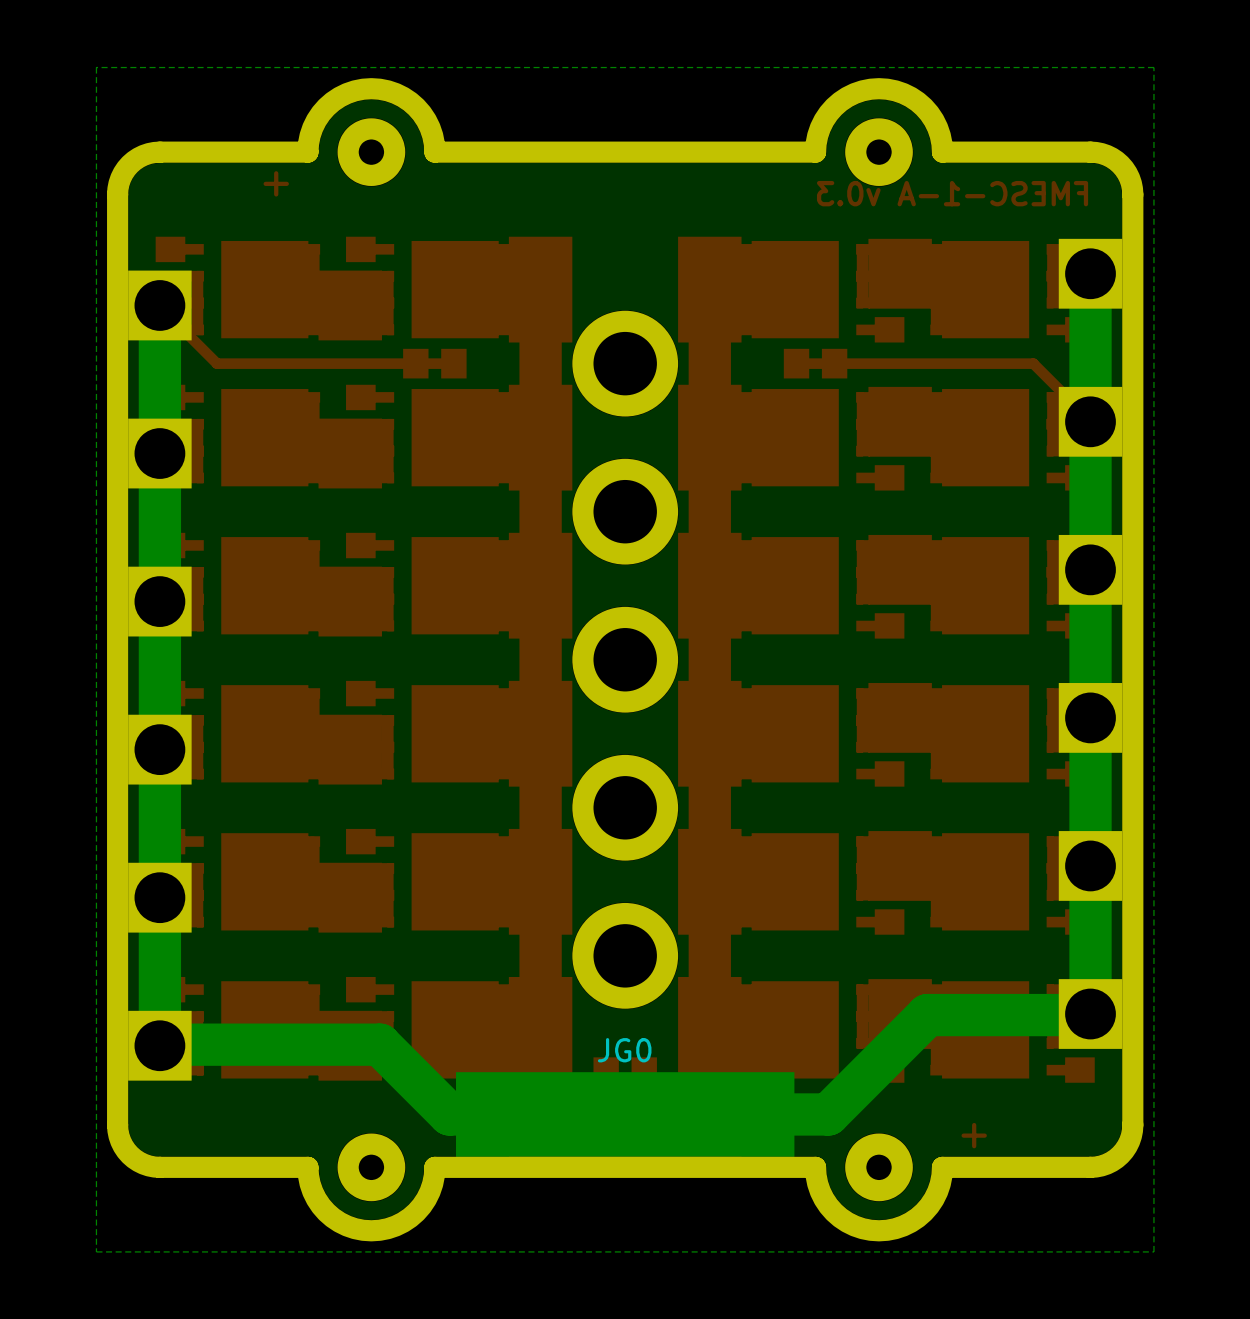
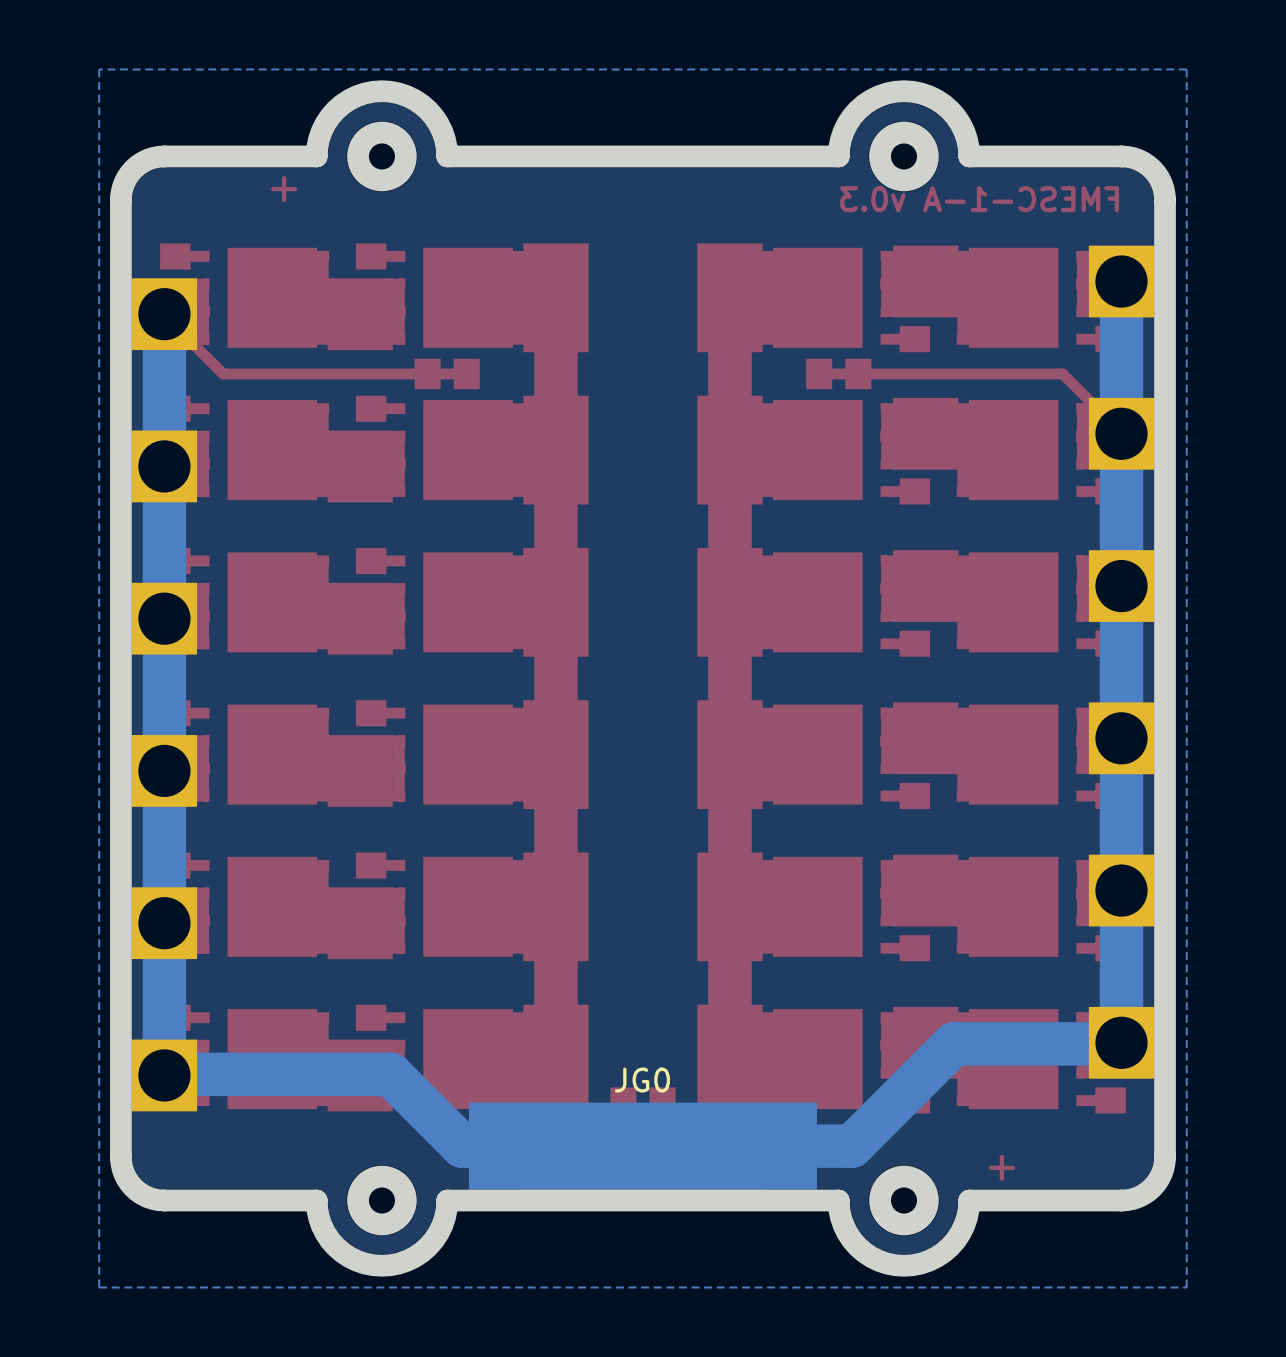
round board edge: [572, 310, 679, 417] -> none
round board edge: [572, 458, 679, 565] -> none
round board edge: [572, 606, 679, 713] -> none
round board edge: [572, 754, 679, 861] -> none
round board edge: [572, 902, 679, 1009] -> none

